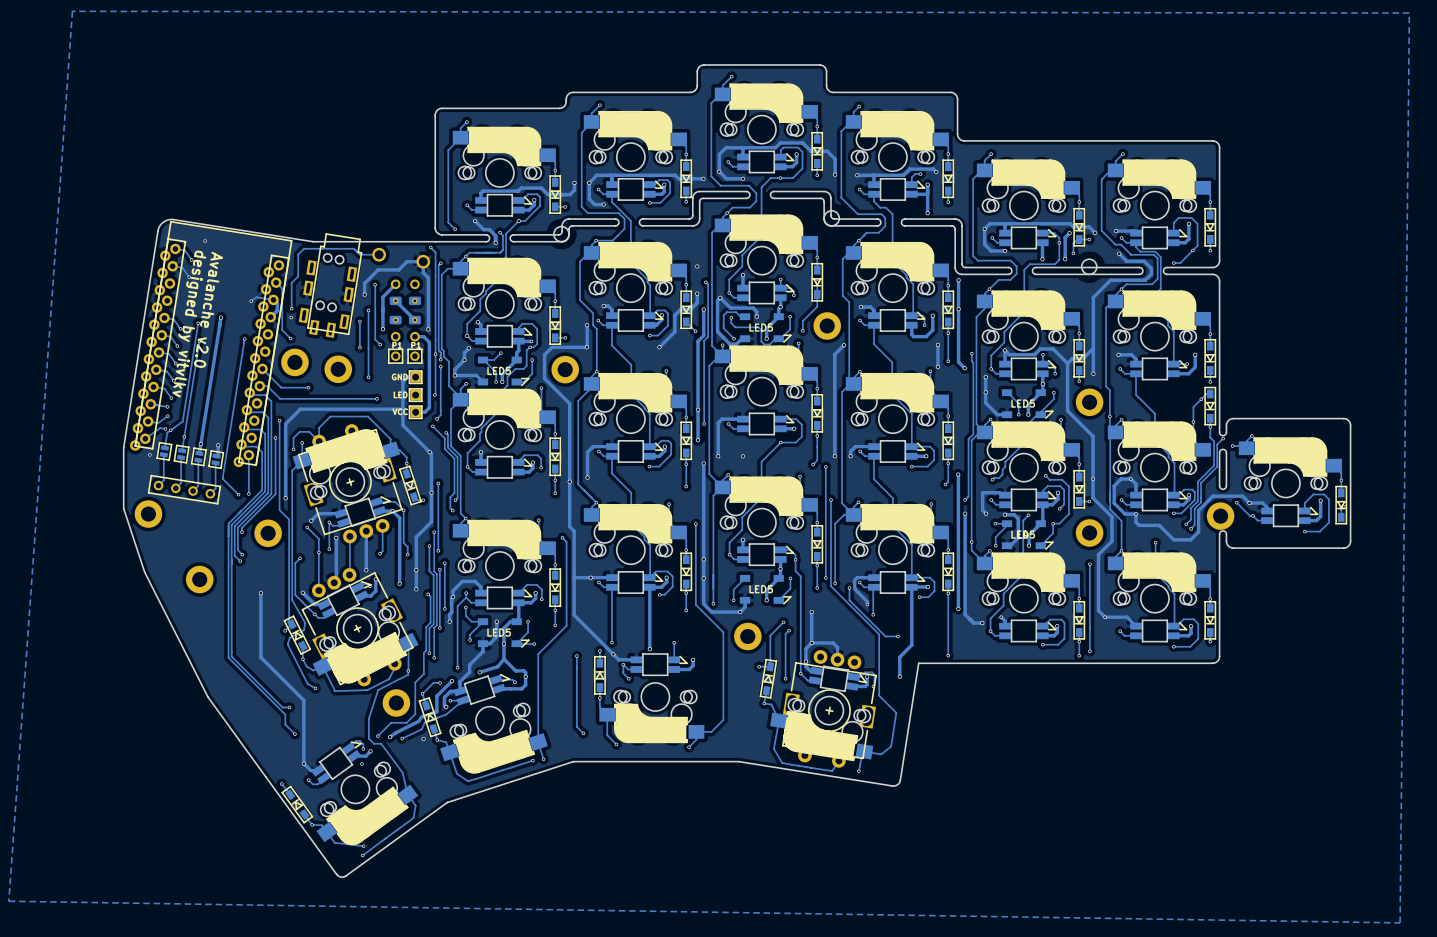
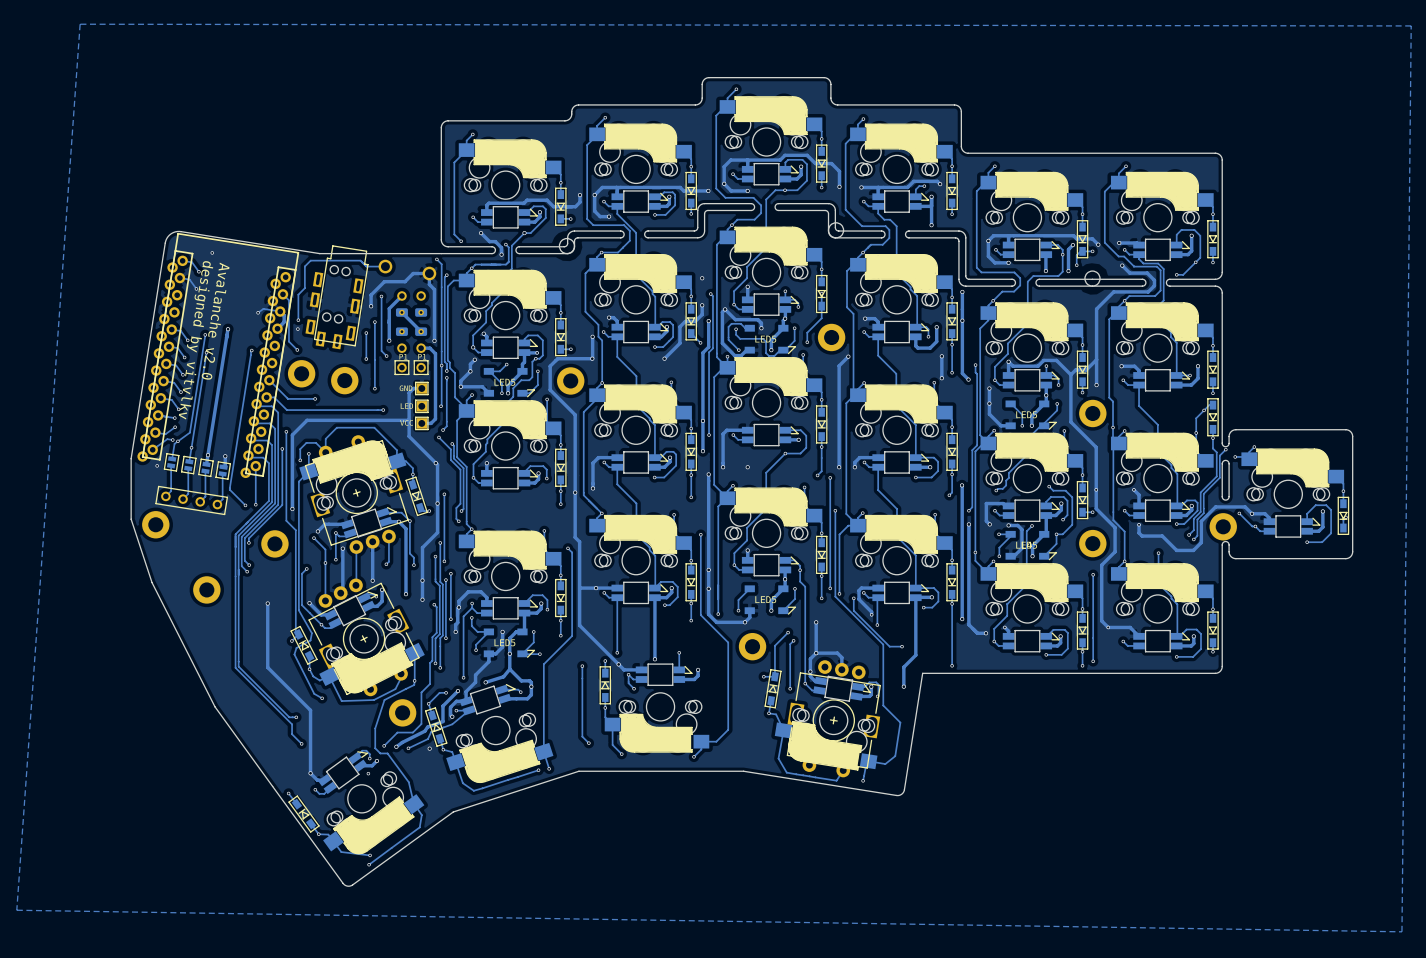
track: (1130, 478) (1121, 478) (1114, 486) (1114, 503) (1125, 514) (1136, 514) -> none

